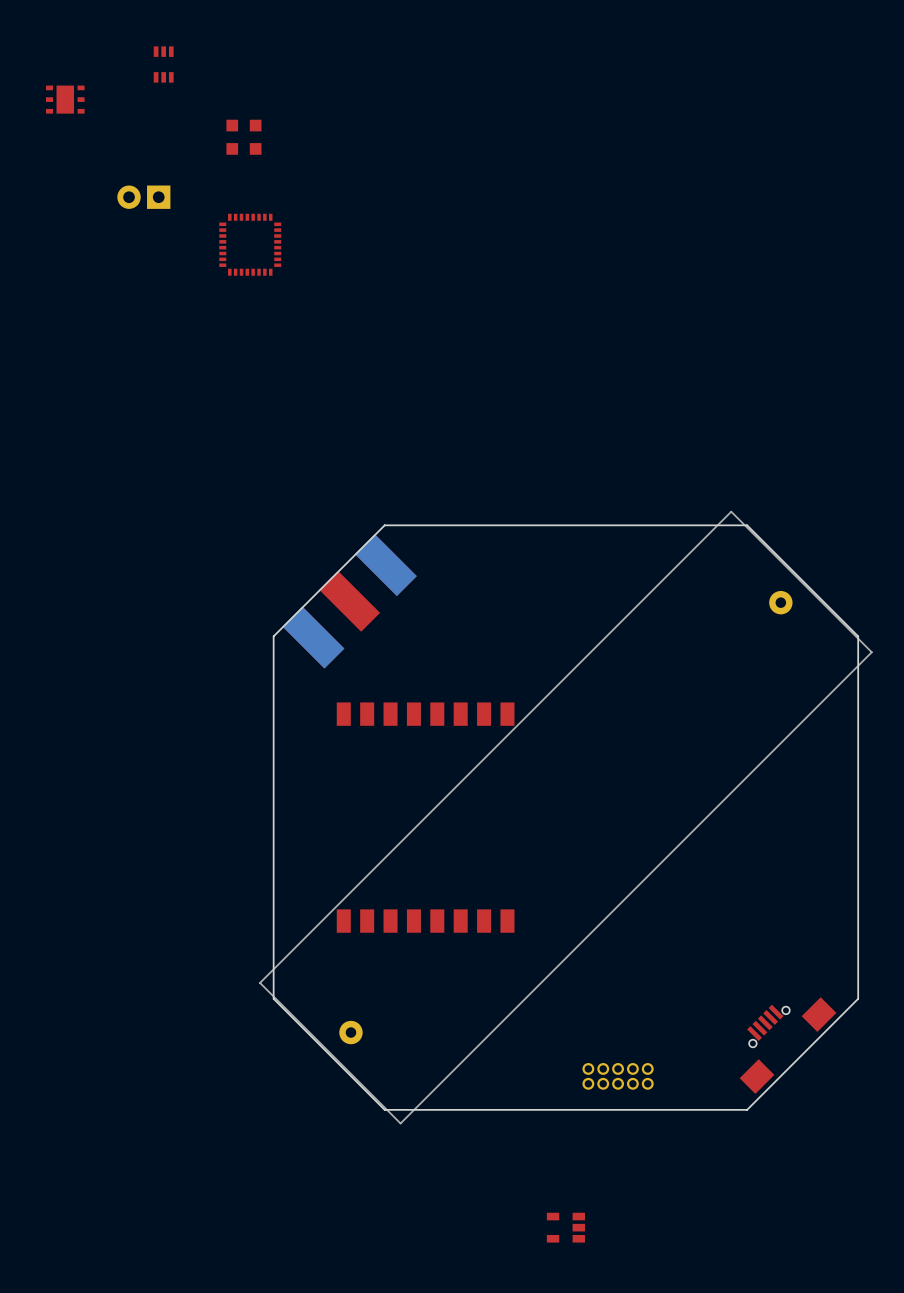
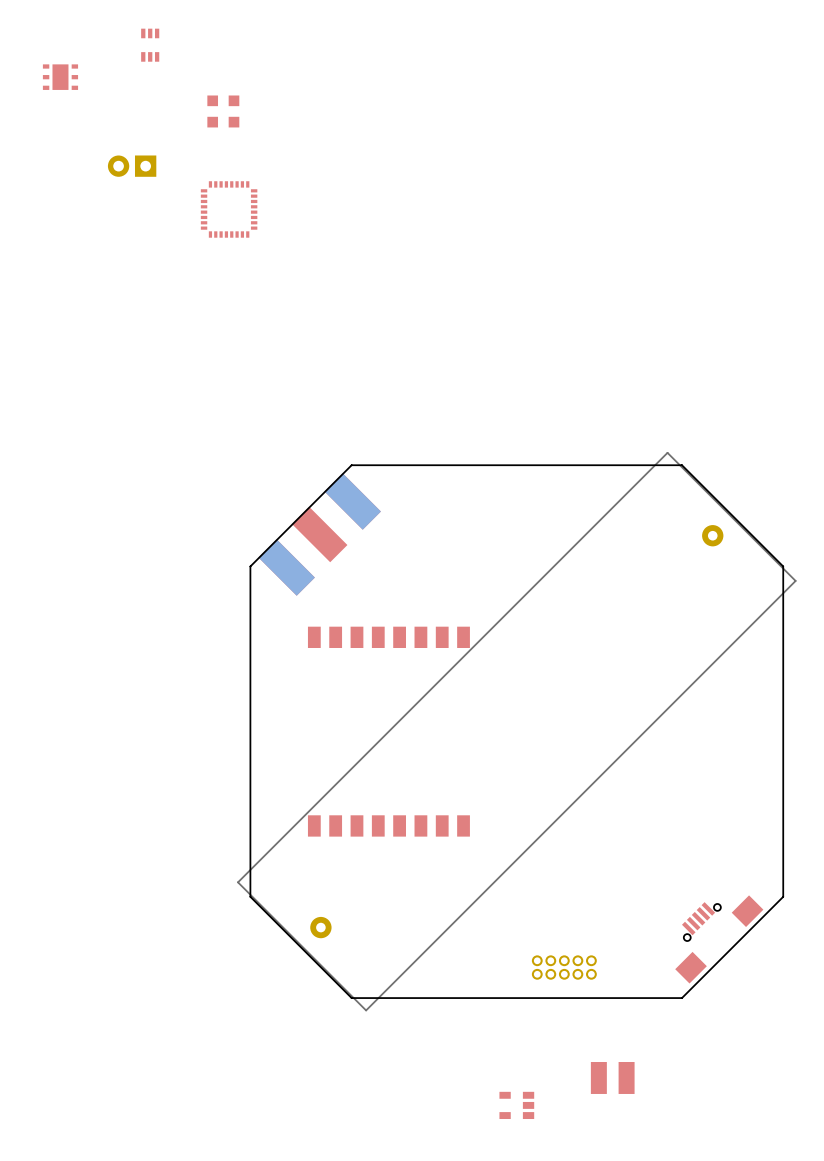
part: none -> (612, 1077)

